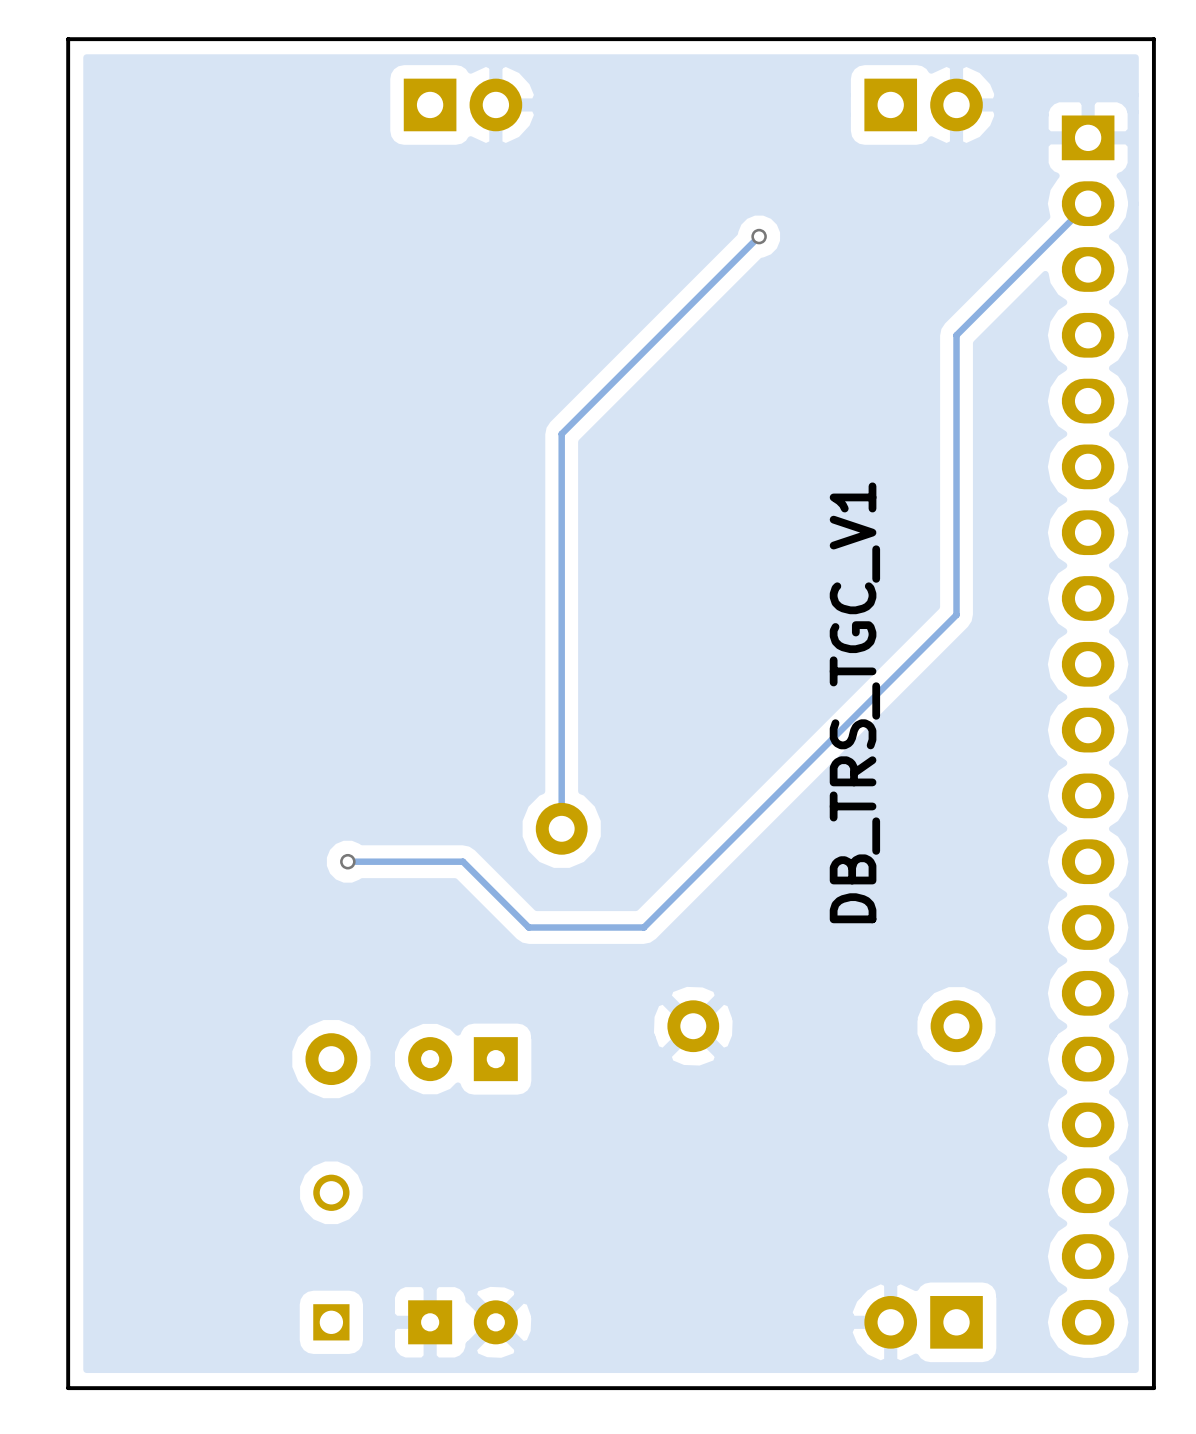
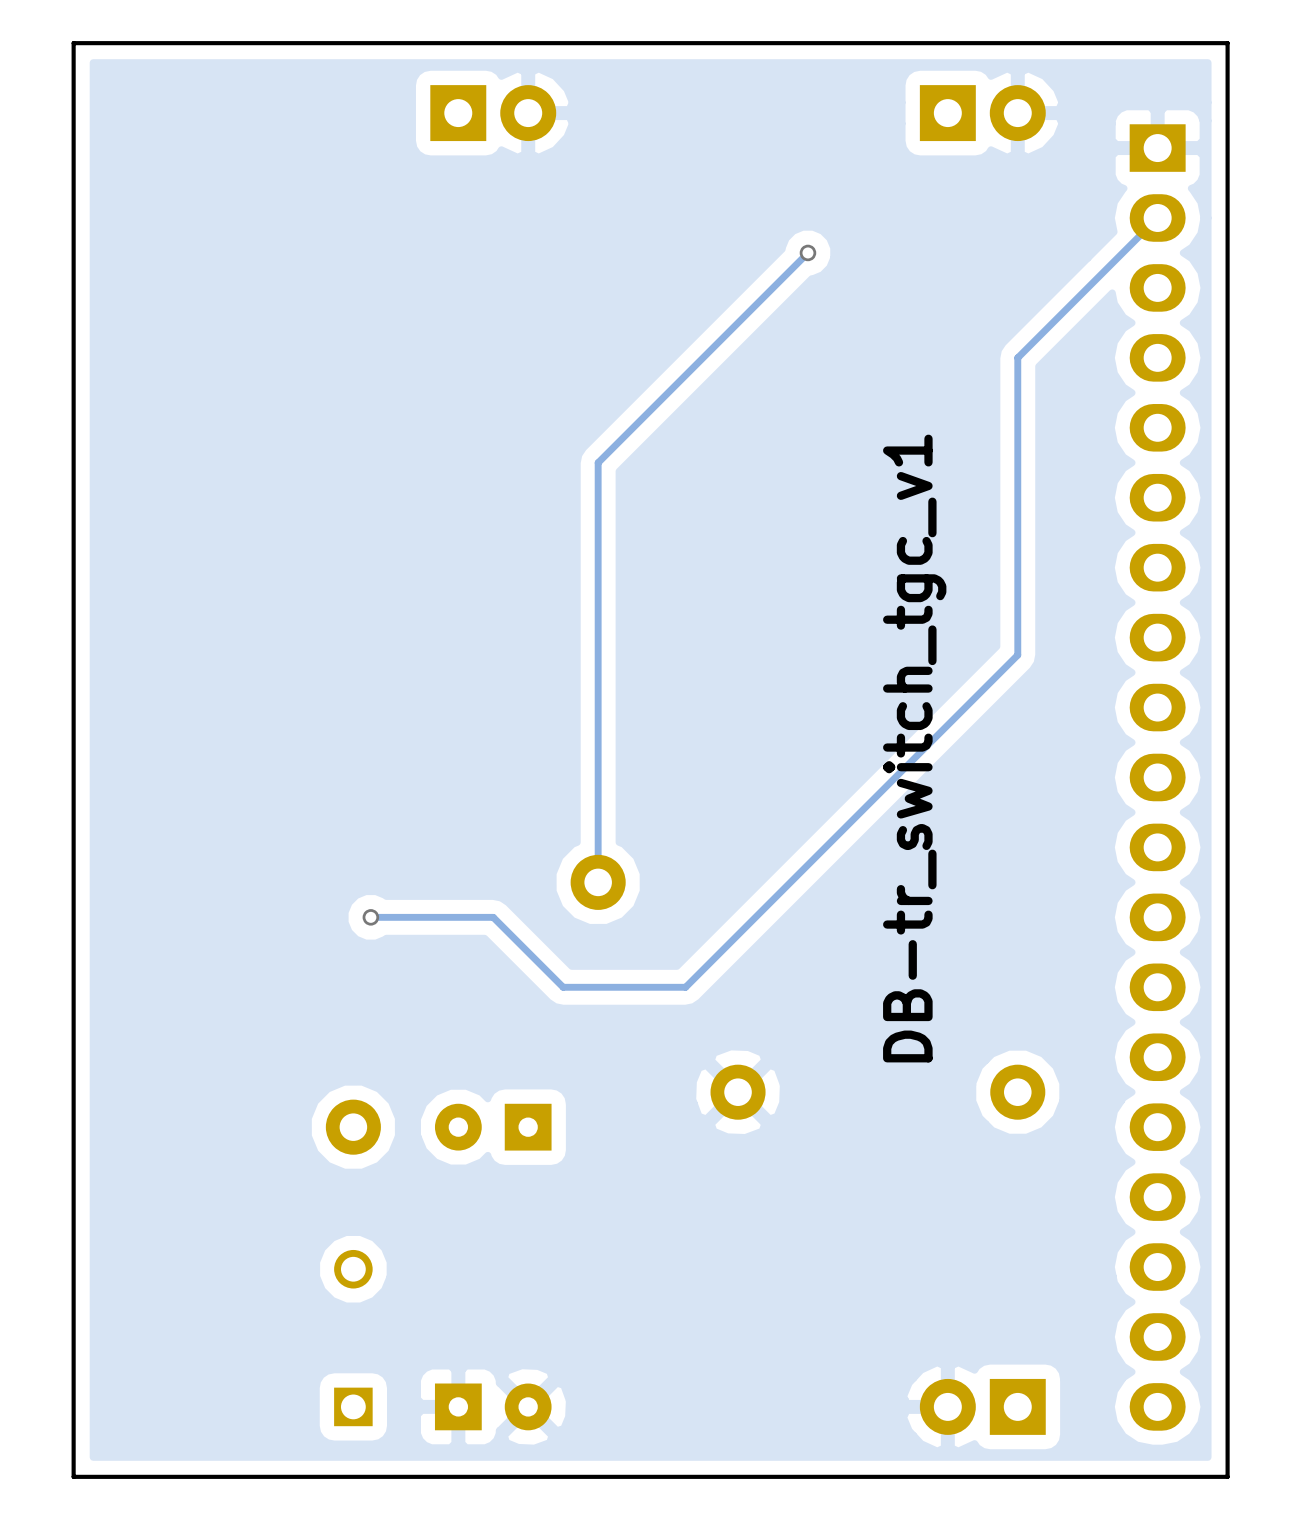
text: DB_TRS_TGC_V1 (854, 702) -> DB-tr_switch_tgc_v1 (914, 748)

